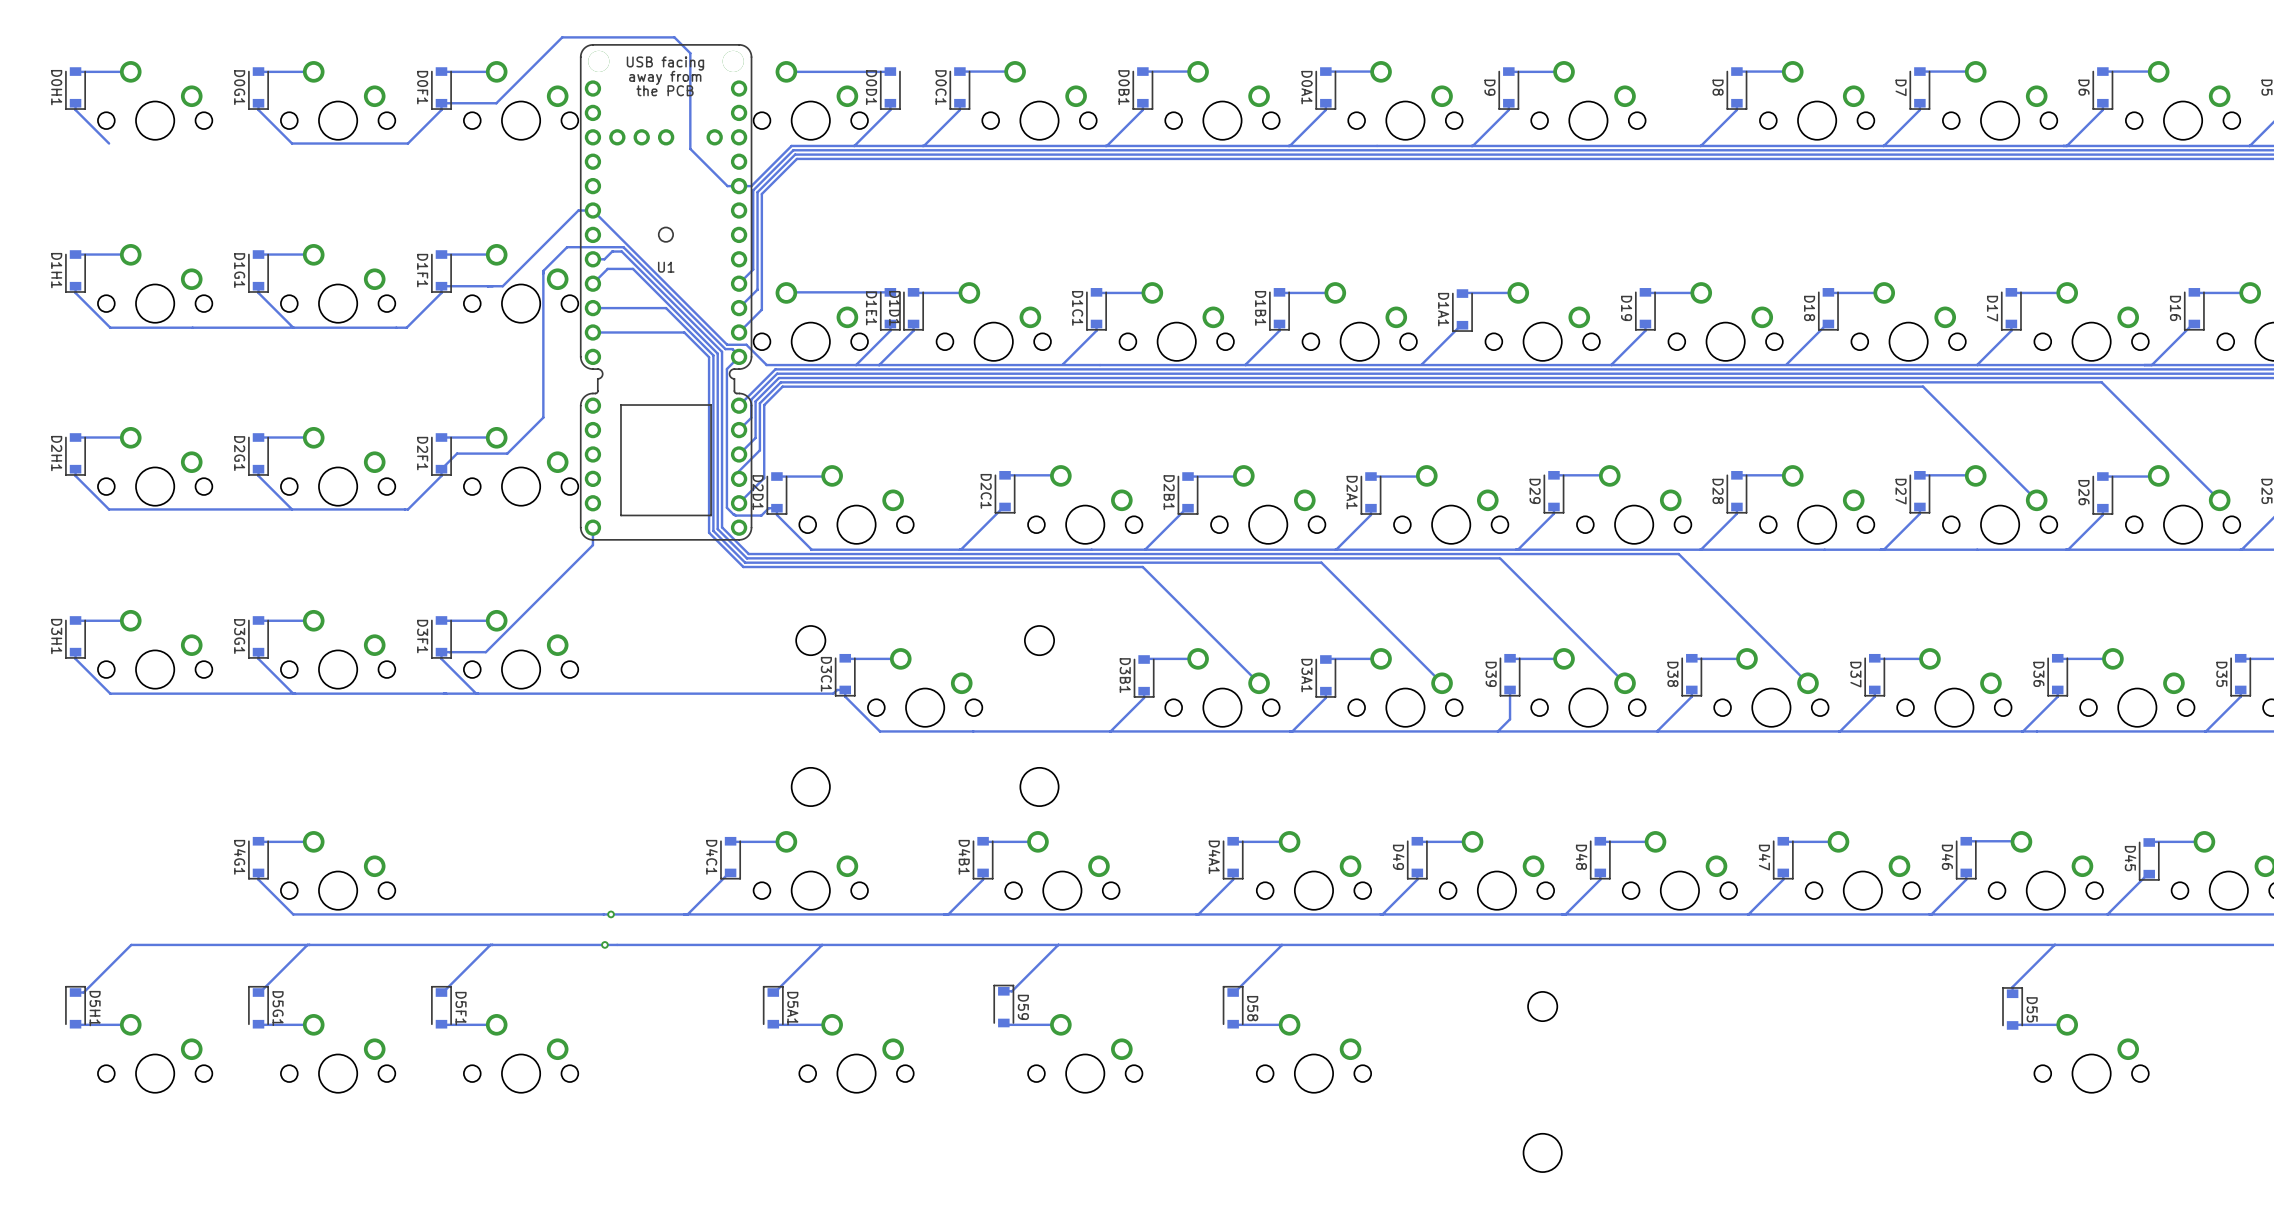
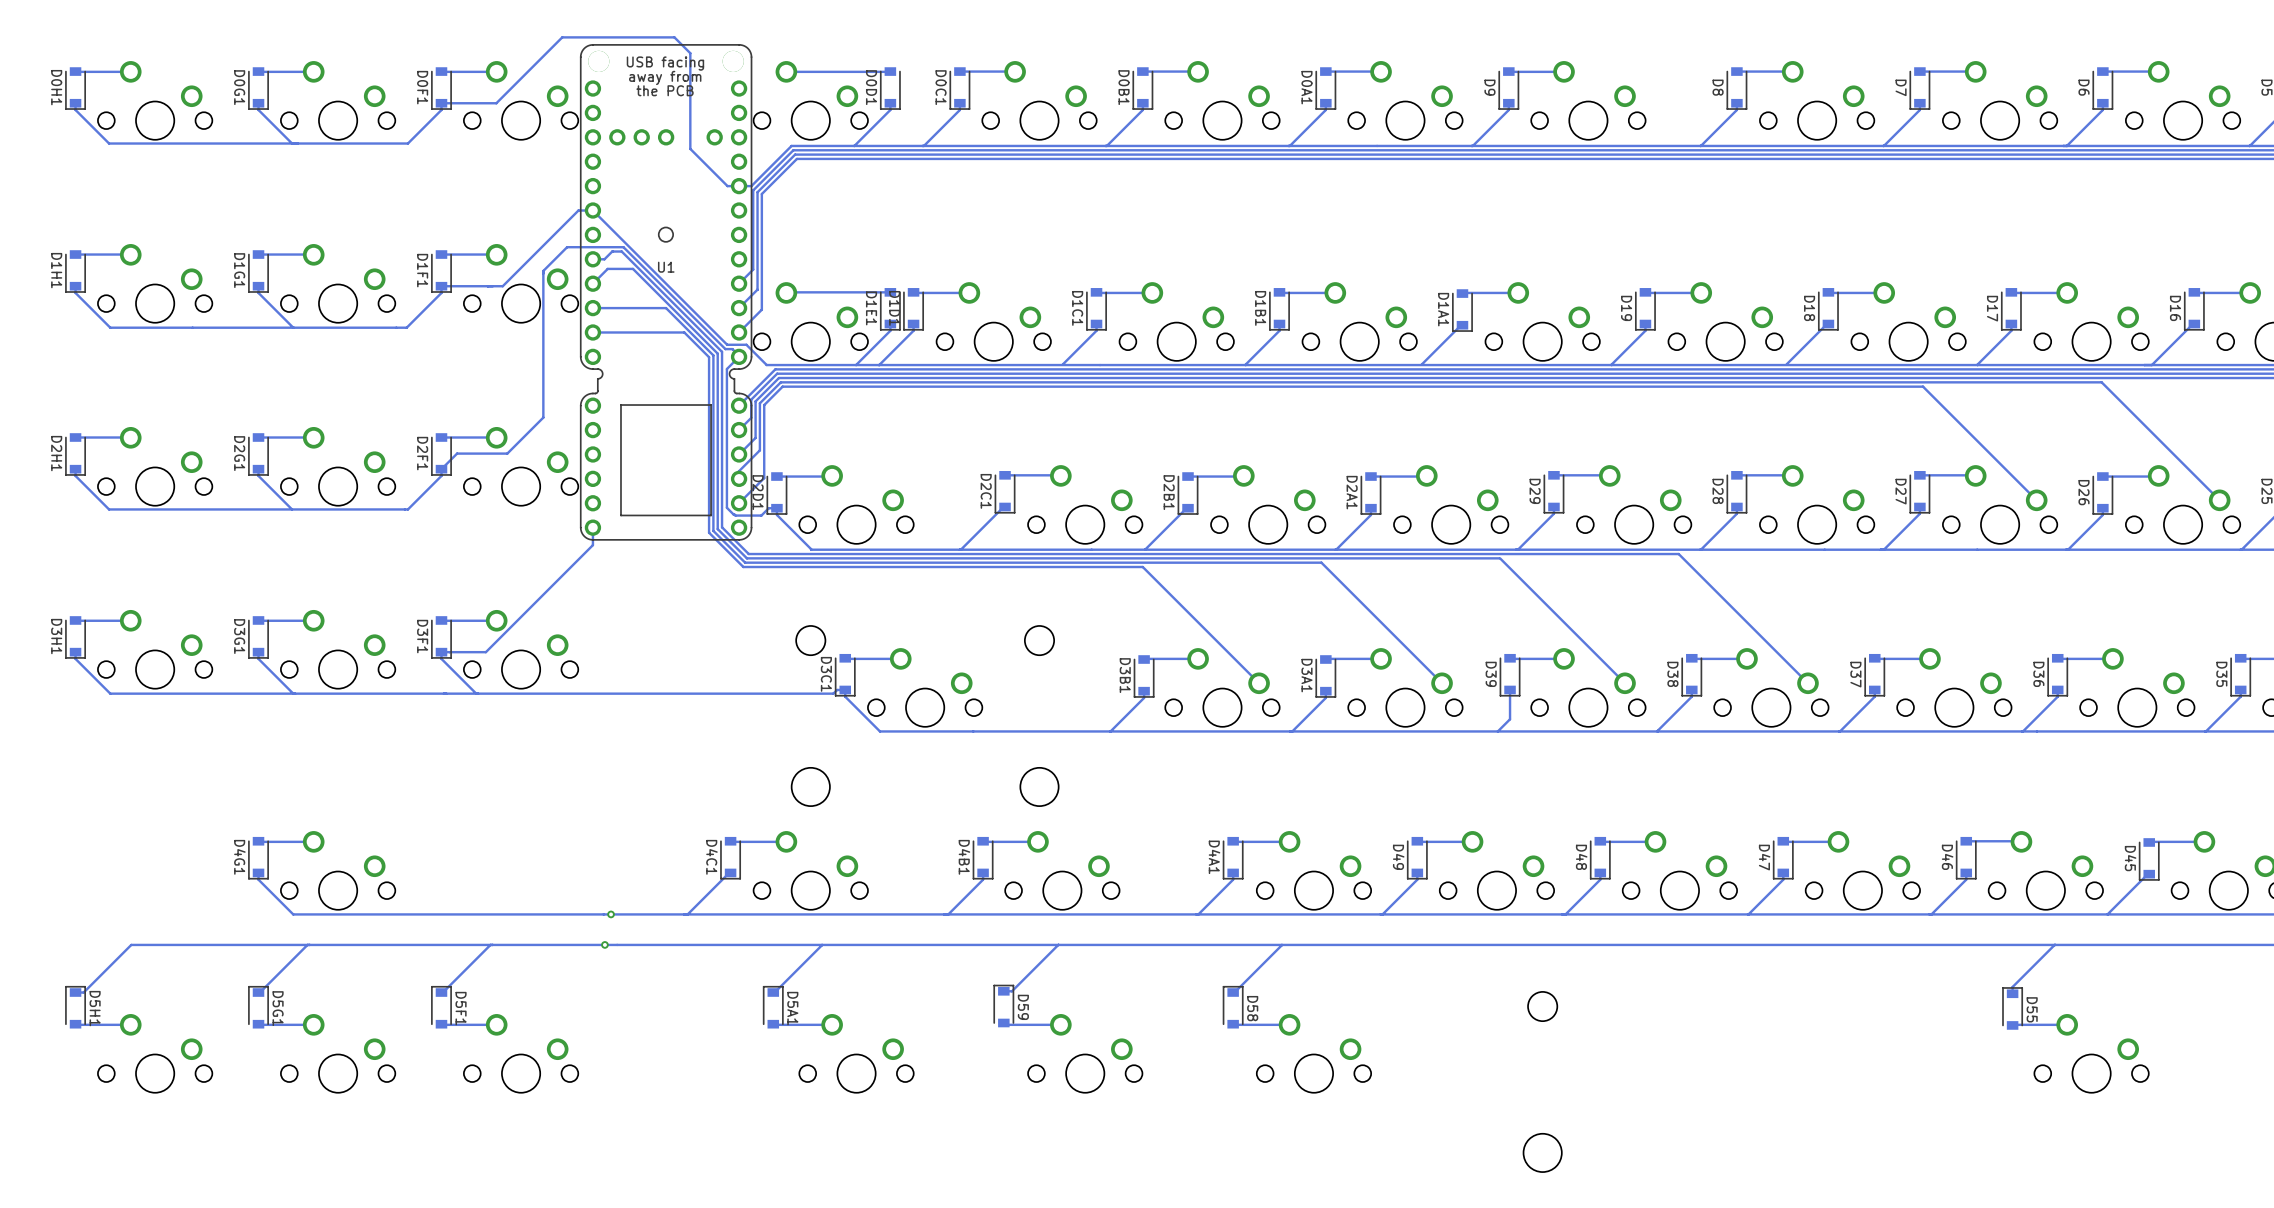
track: none -> (292, 143) (109, 143)

